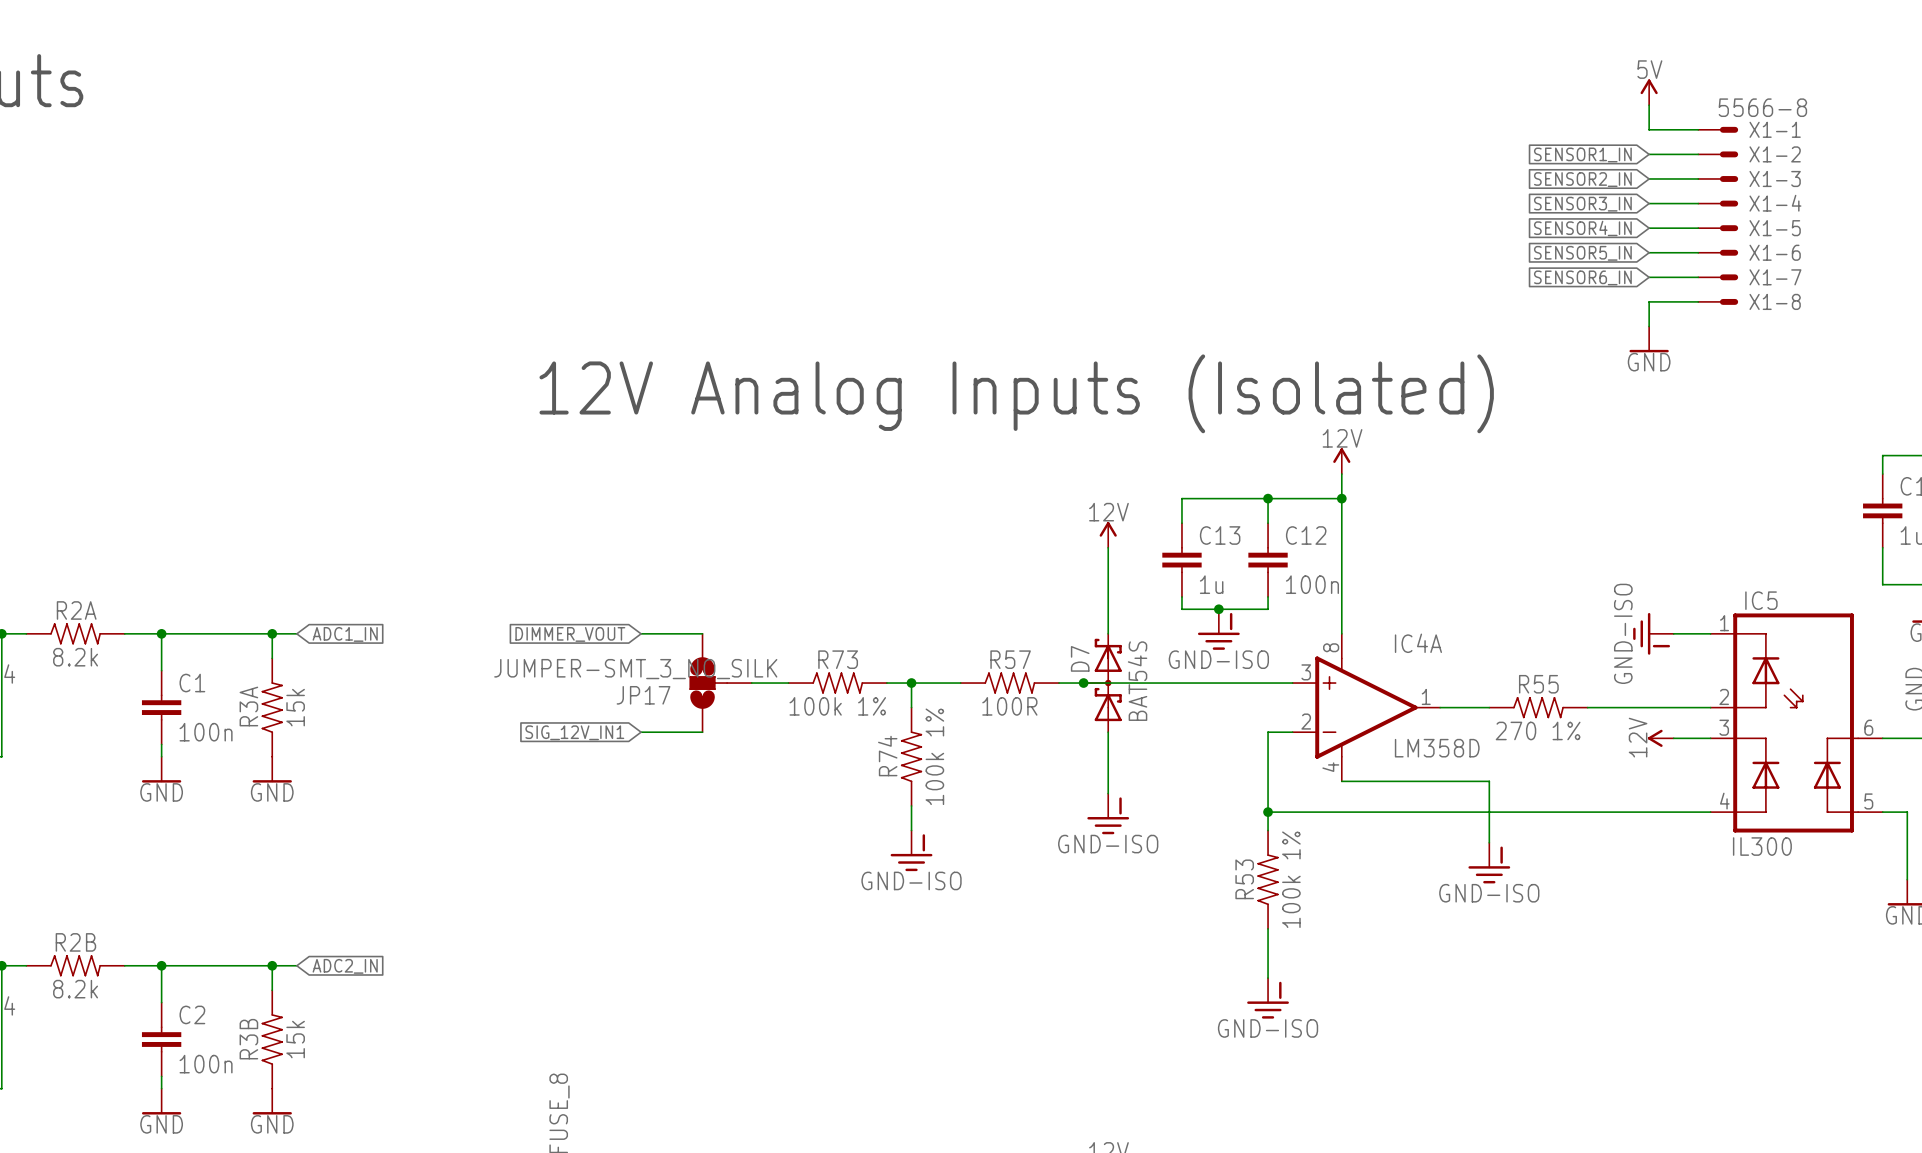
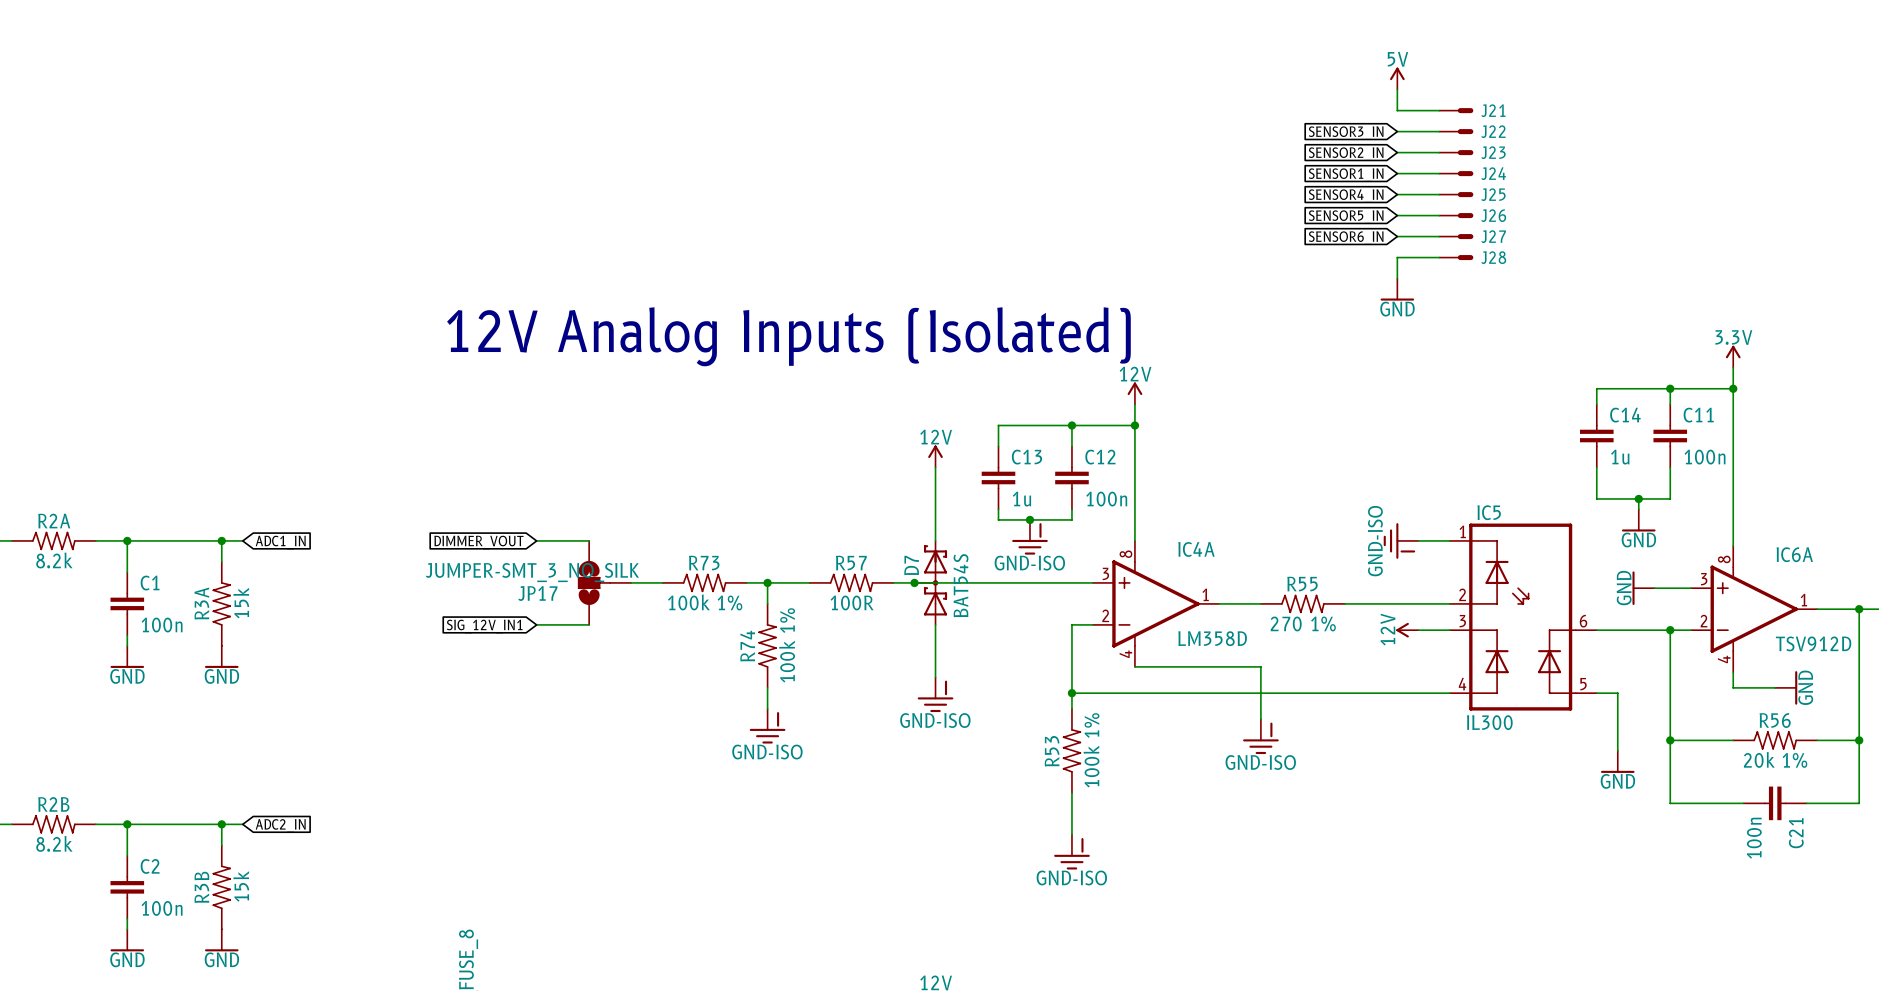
X1-1 value: 5566-8 (1762, 107) -> none
X1-1 name: X1-1 (1775, 129) -> J21 (1493, 110)
global label: SENSOR1_IN (1582, 154) -> SENSOR3_IN (1346, 133)
X1-2 name: X1-2 (1775, 154) -> J22 (1493, 131)
X1-3 name: X1-3 (1775, 178) -> J23 (1493, 152)
X1-4 name: X1-4 (1775, 203) -> J24 (1493, 173)
global label: SENSOR3_IN (1582, 204) -> SENSOR1_IN (1346, 175)
X1-5 name: X1-5 (1775, 228) -> J25 (1493, 194)
X1-6 name: X1-6 (1775, 252) -> J26 (1493, 215)
X1-7 name: X1-7 (1775, 277) -> J27 (1493, 236)
X1-8 name: X1-8 (1775, 301) -> J28 (1493, 257)

